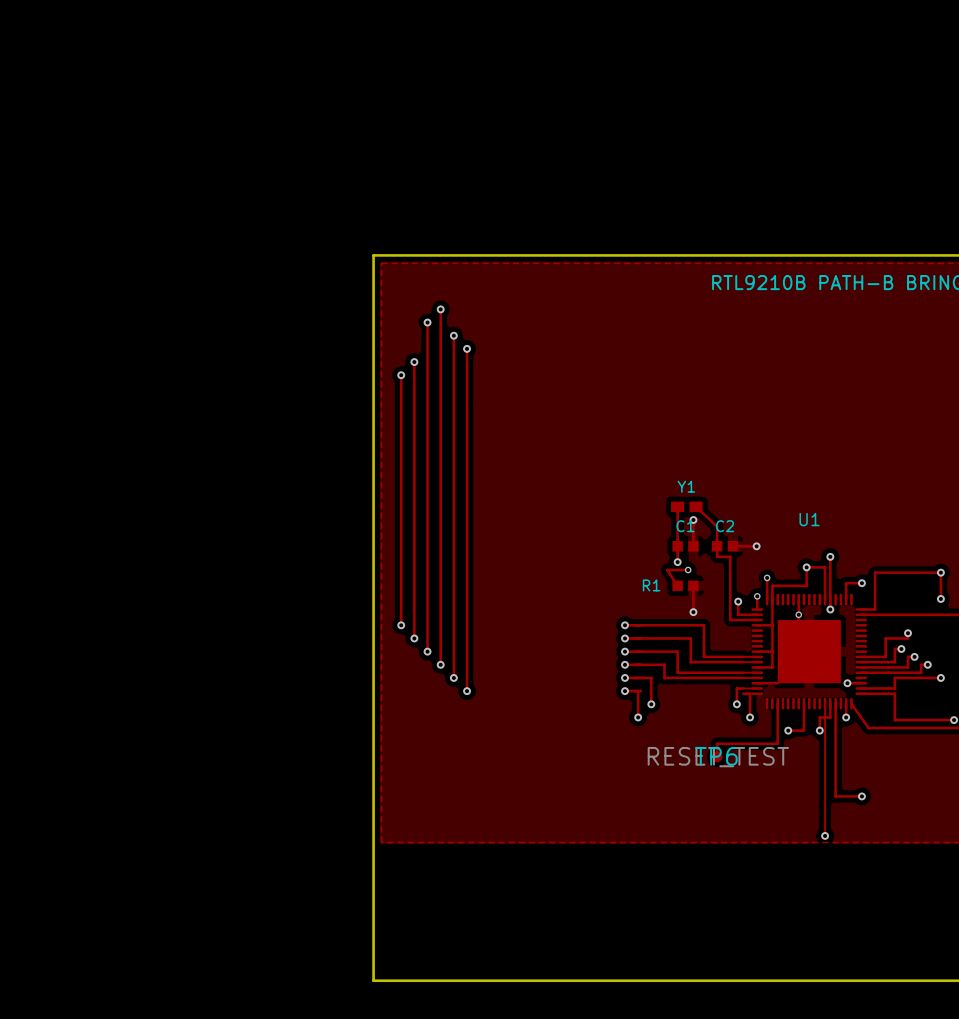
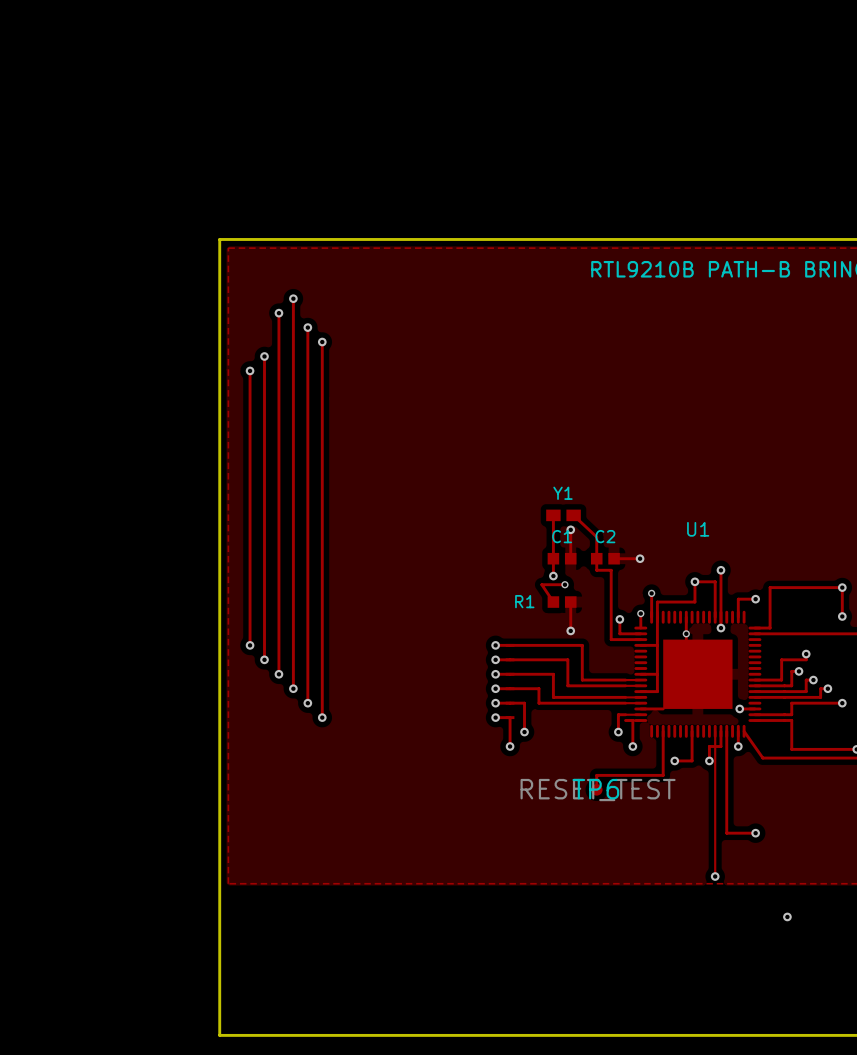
via: none -> (787, 916)

